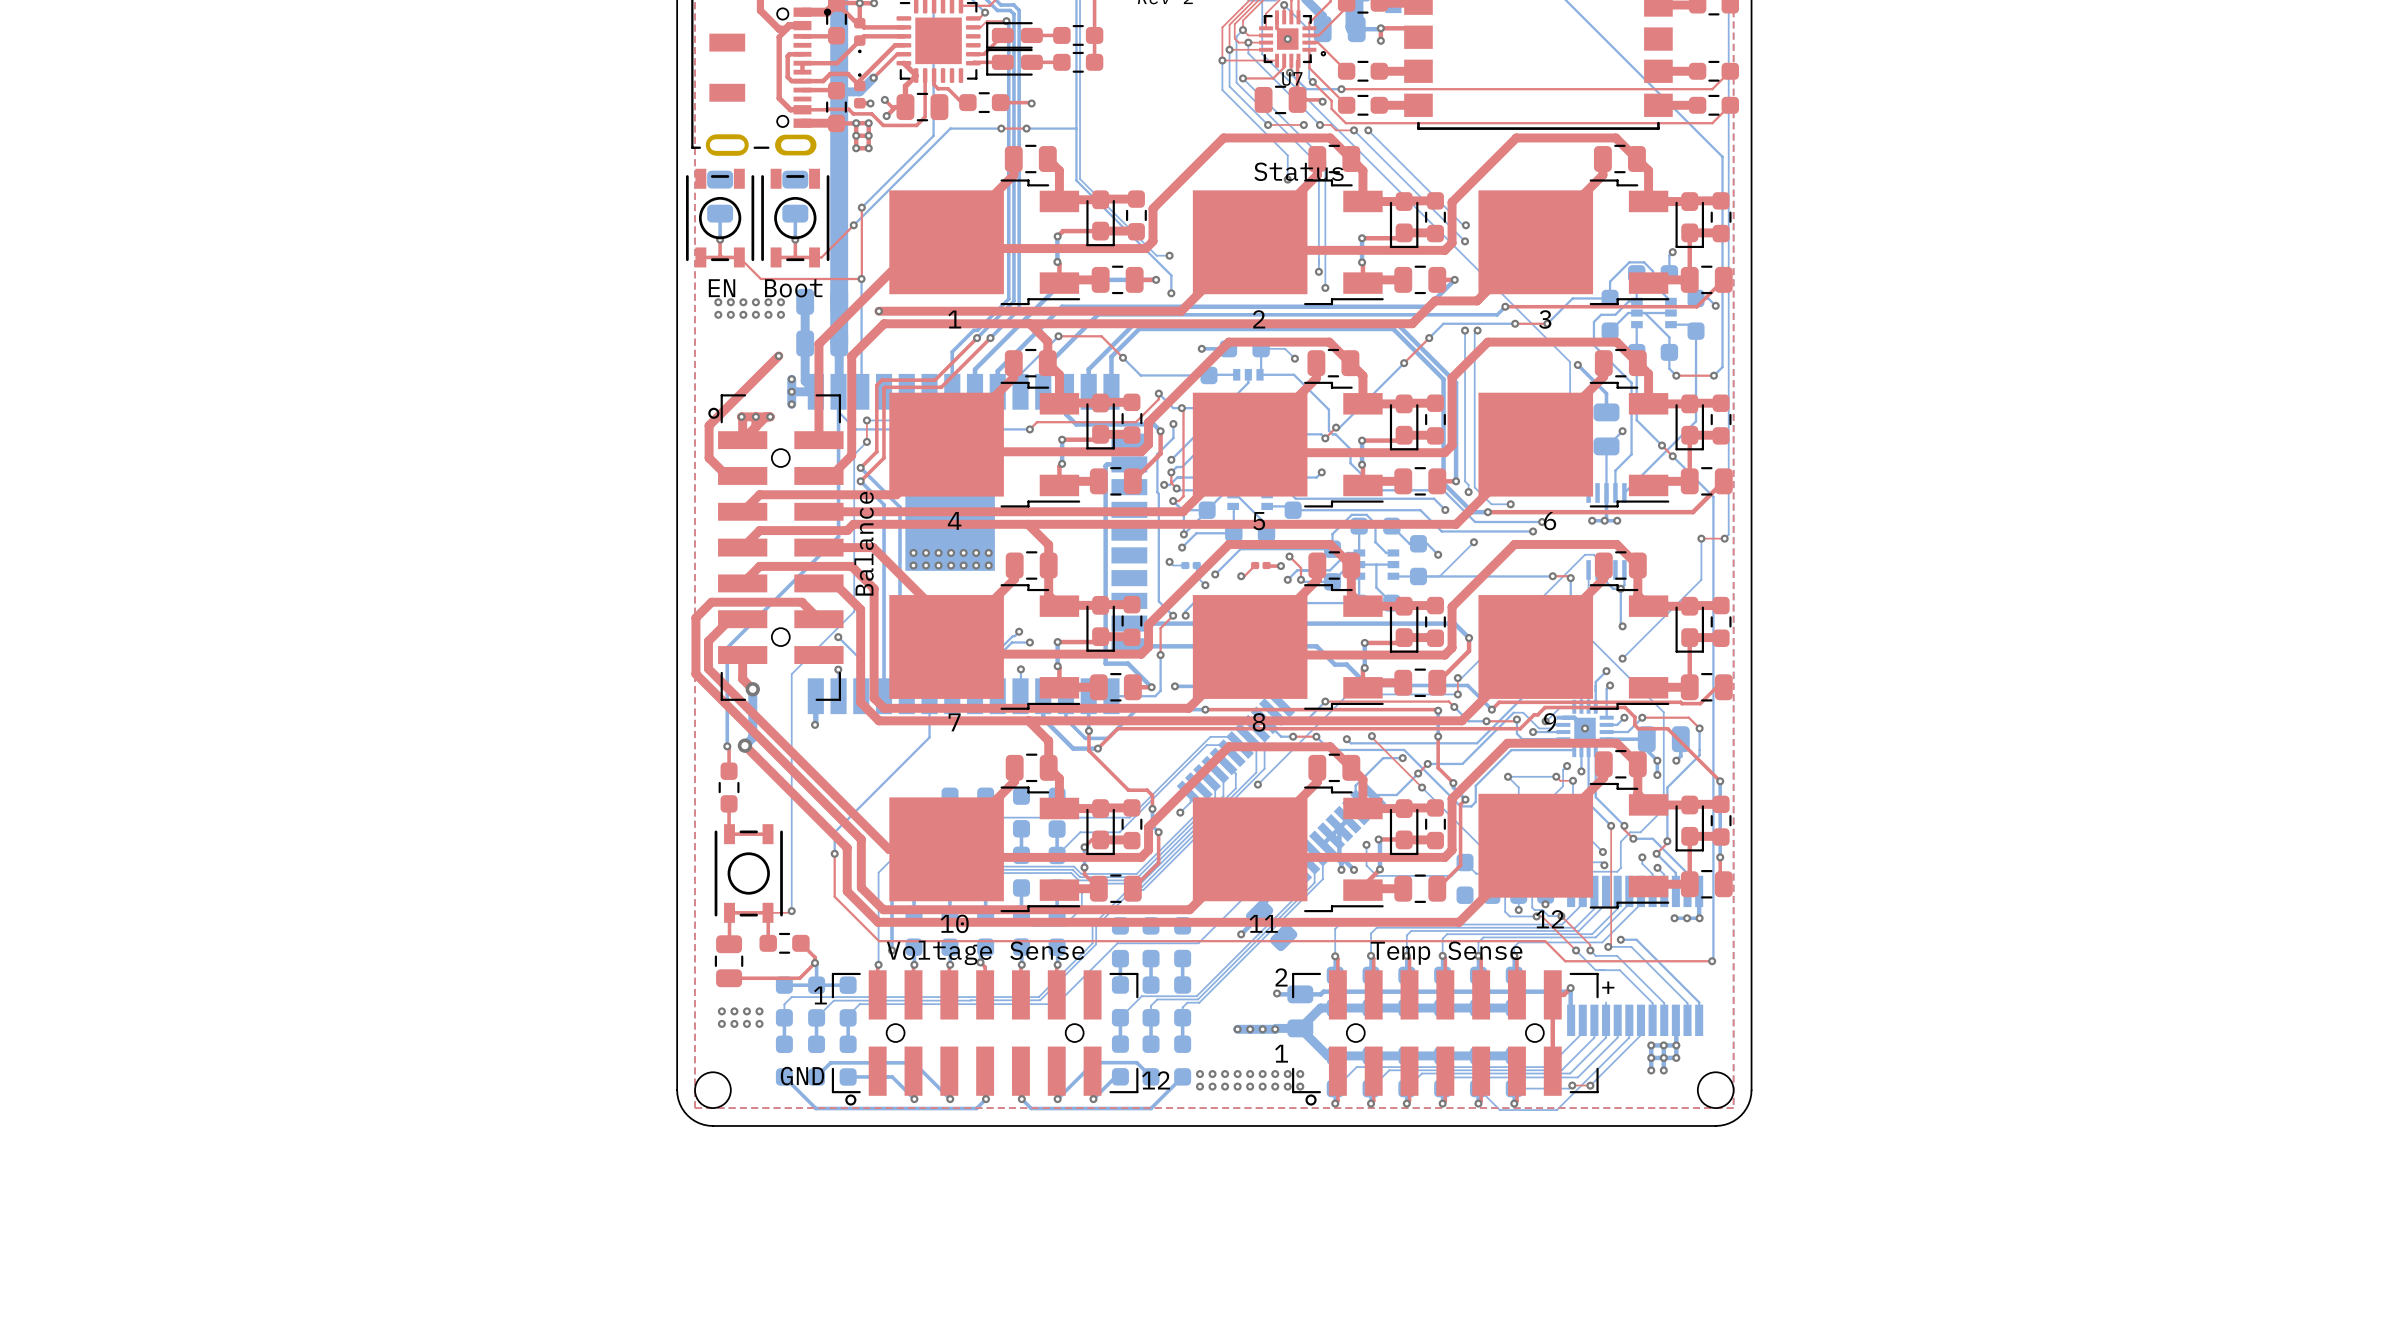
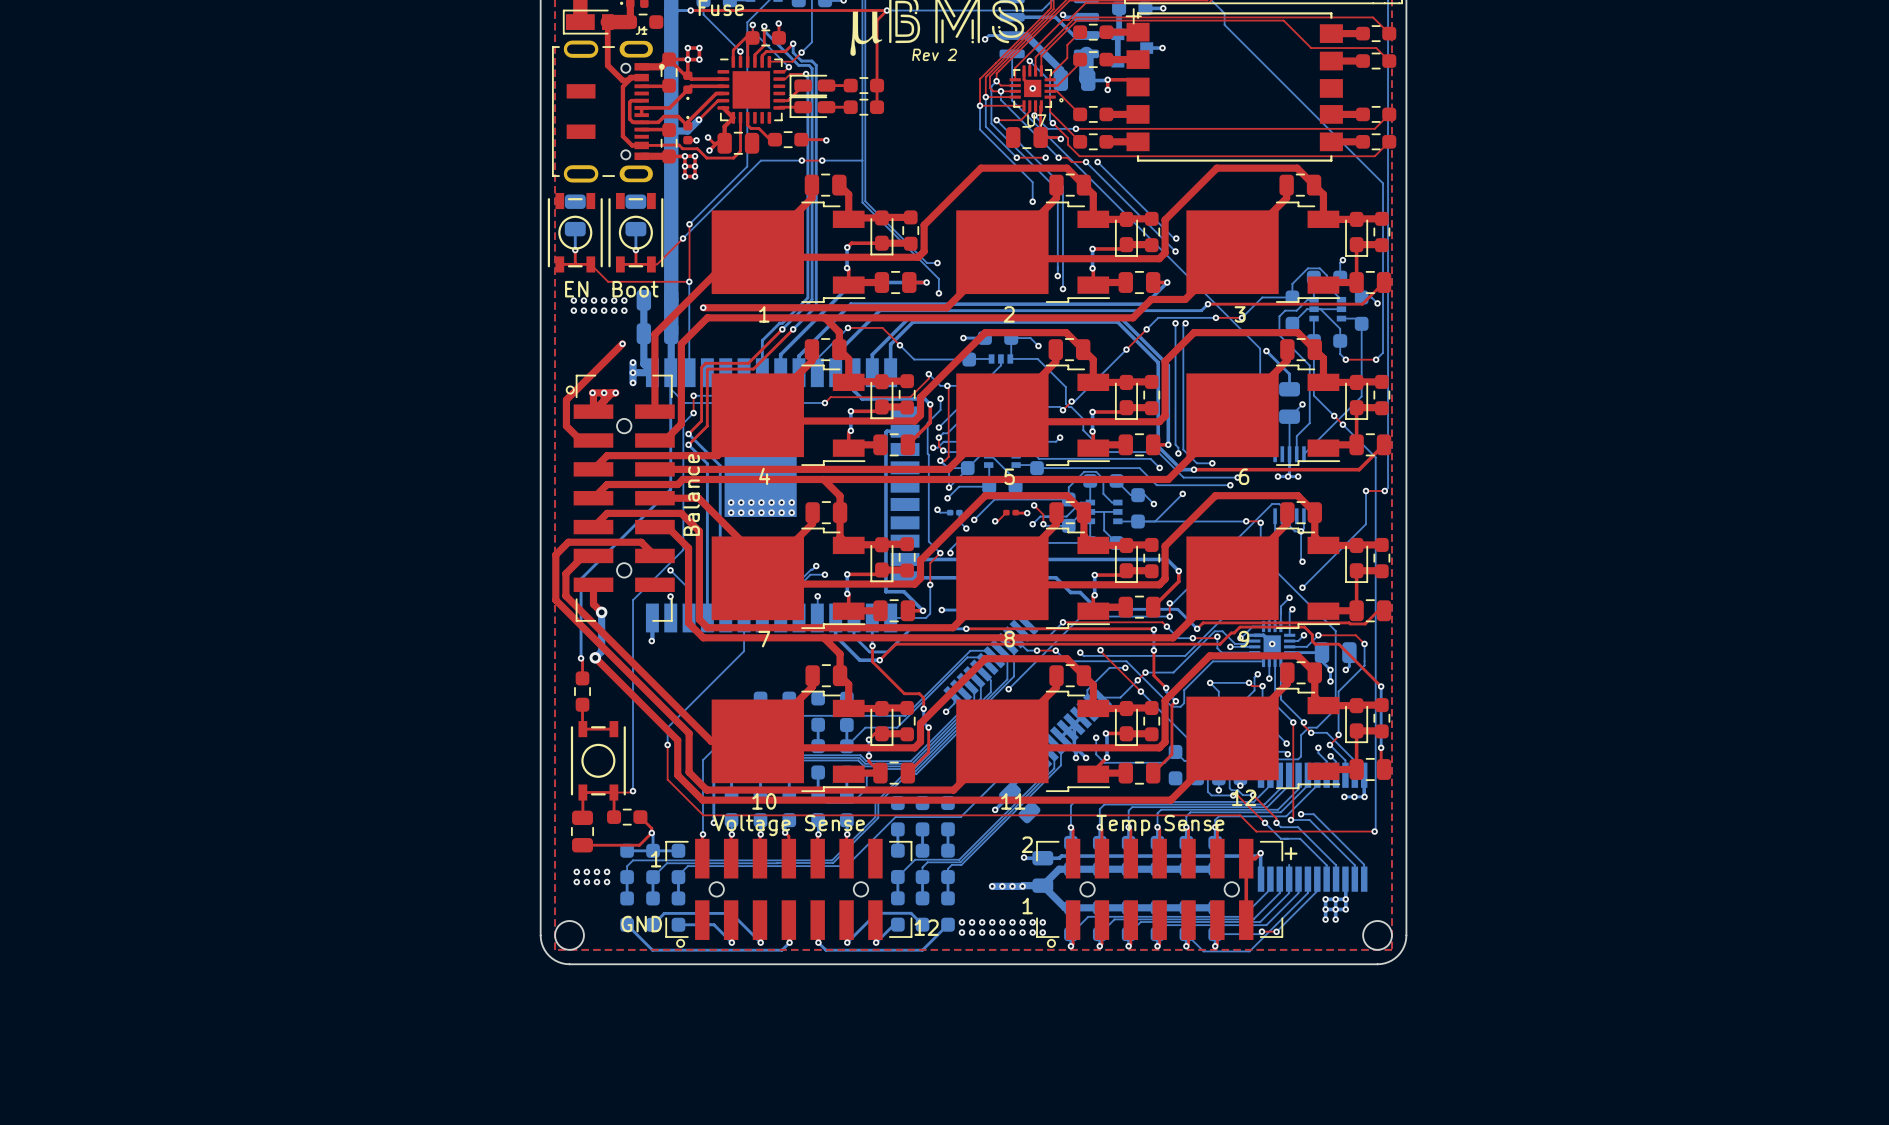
text: Status (1298, 171) -> none

